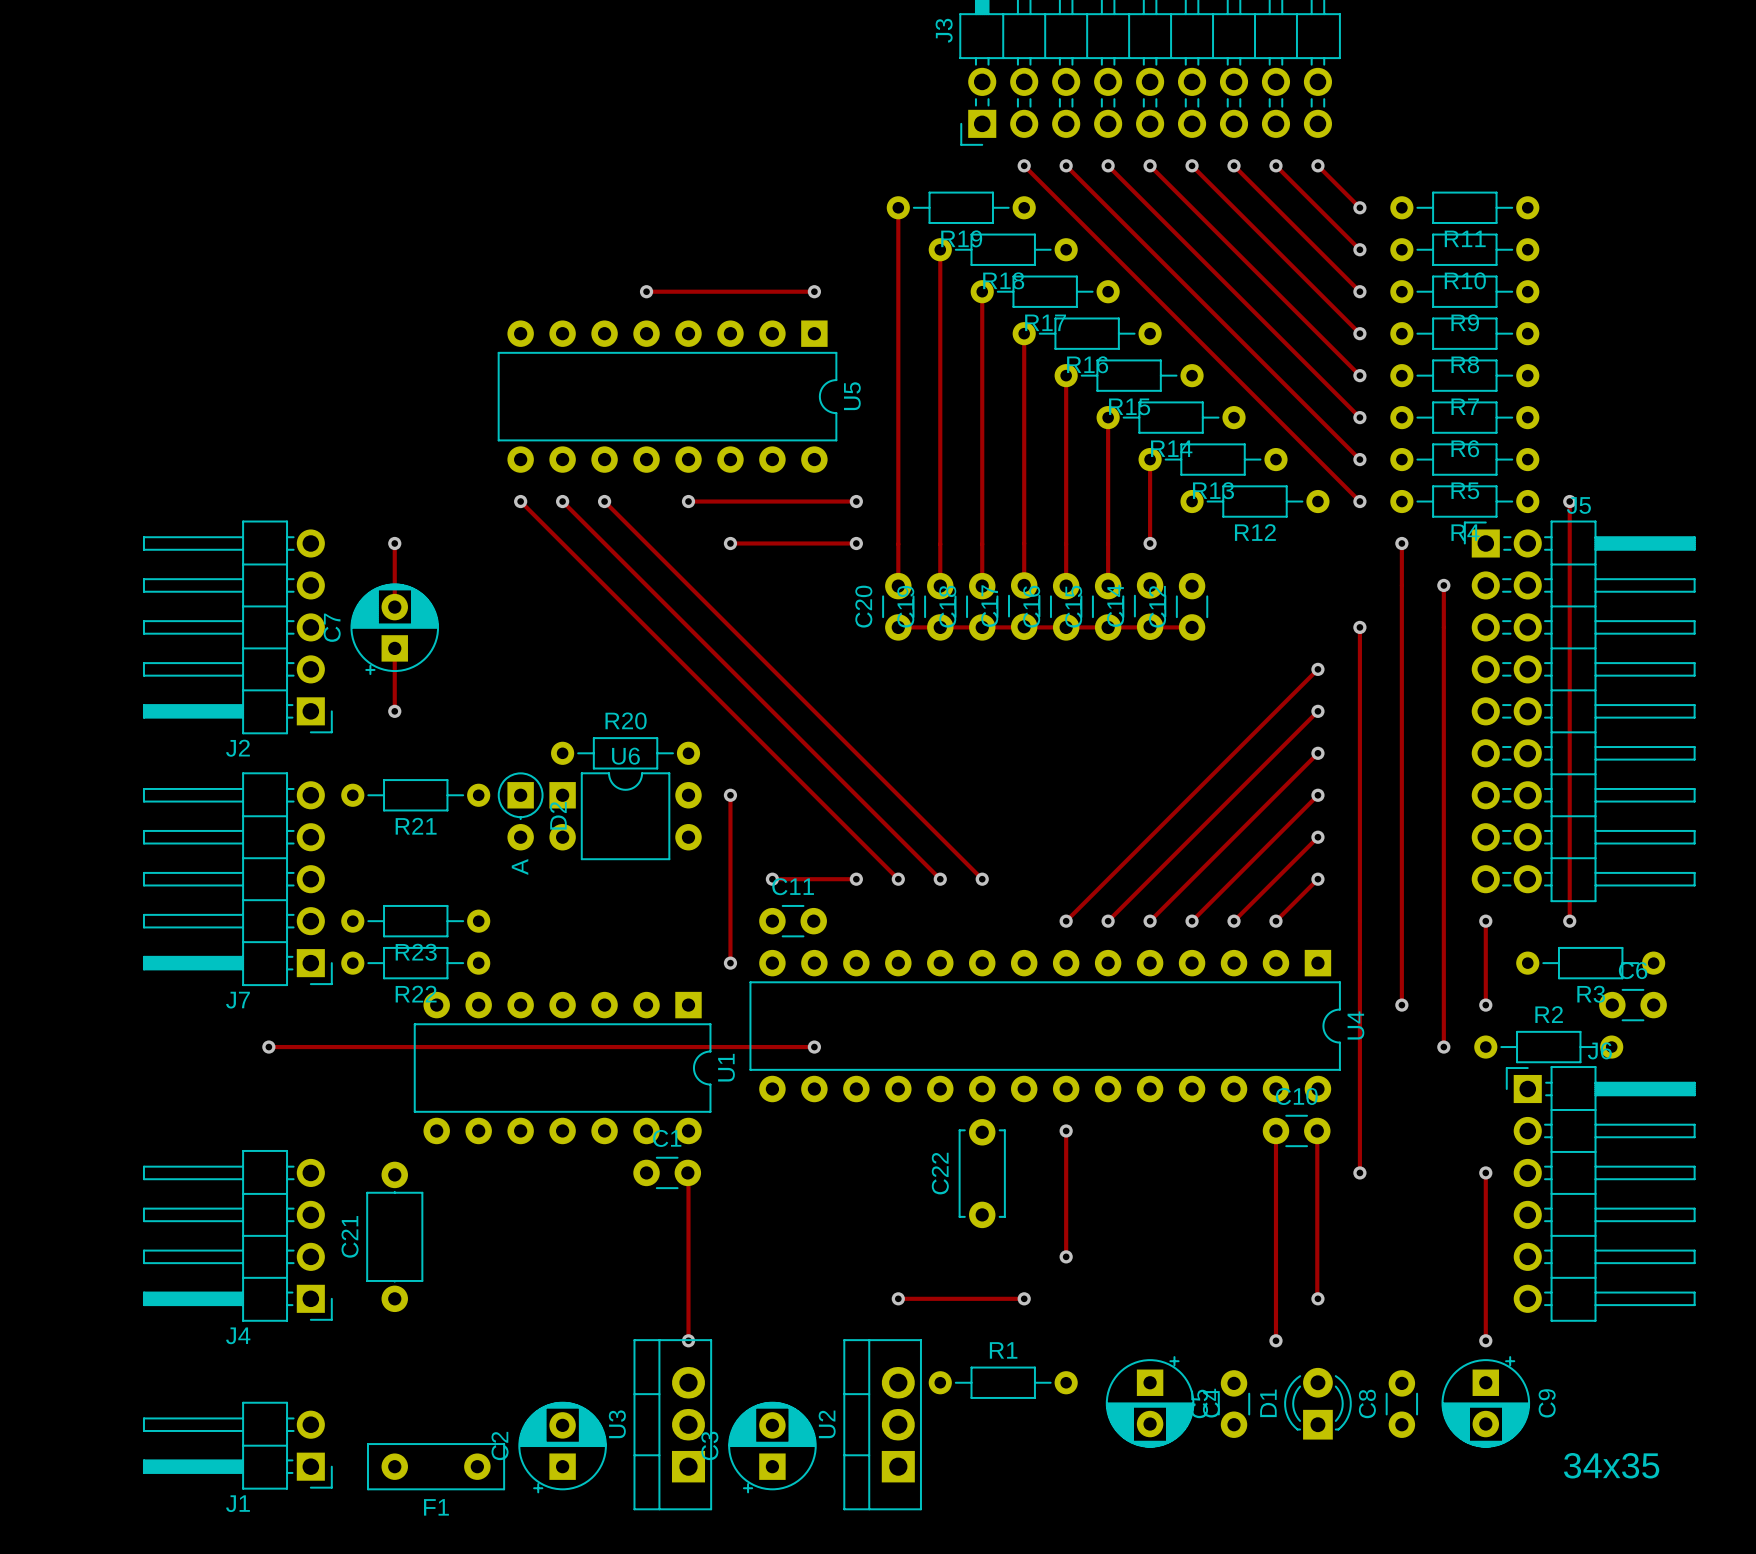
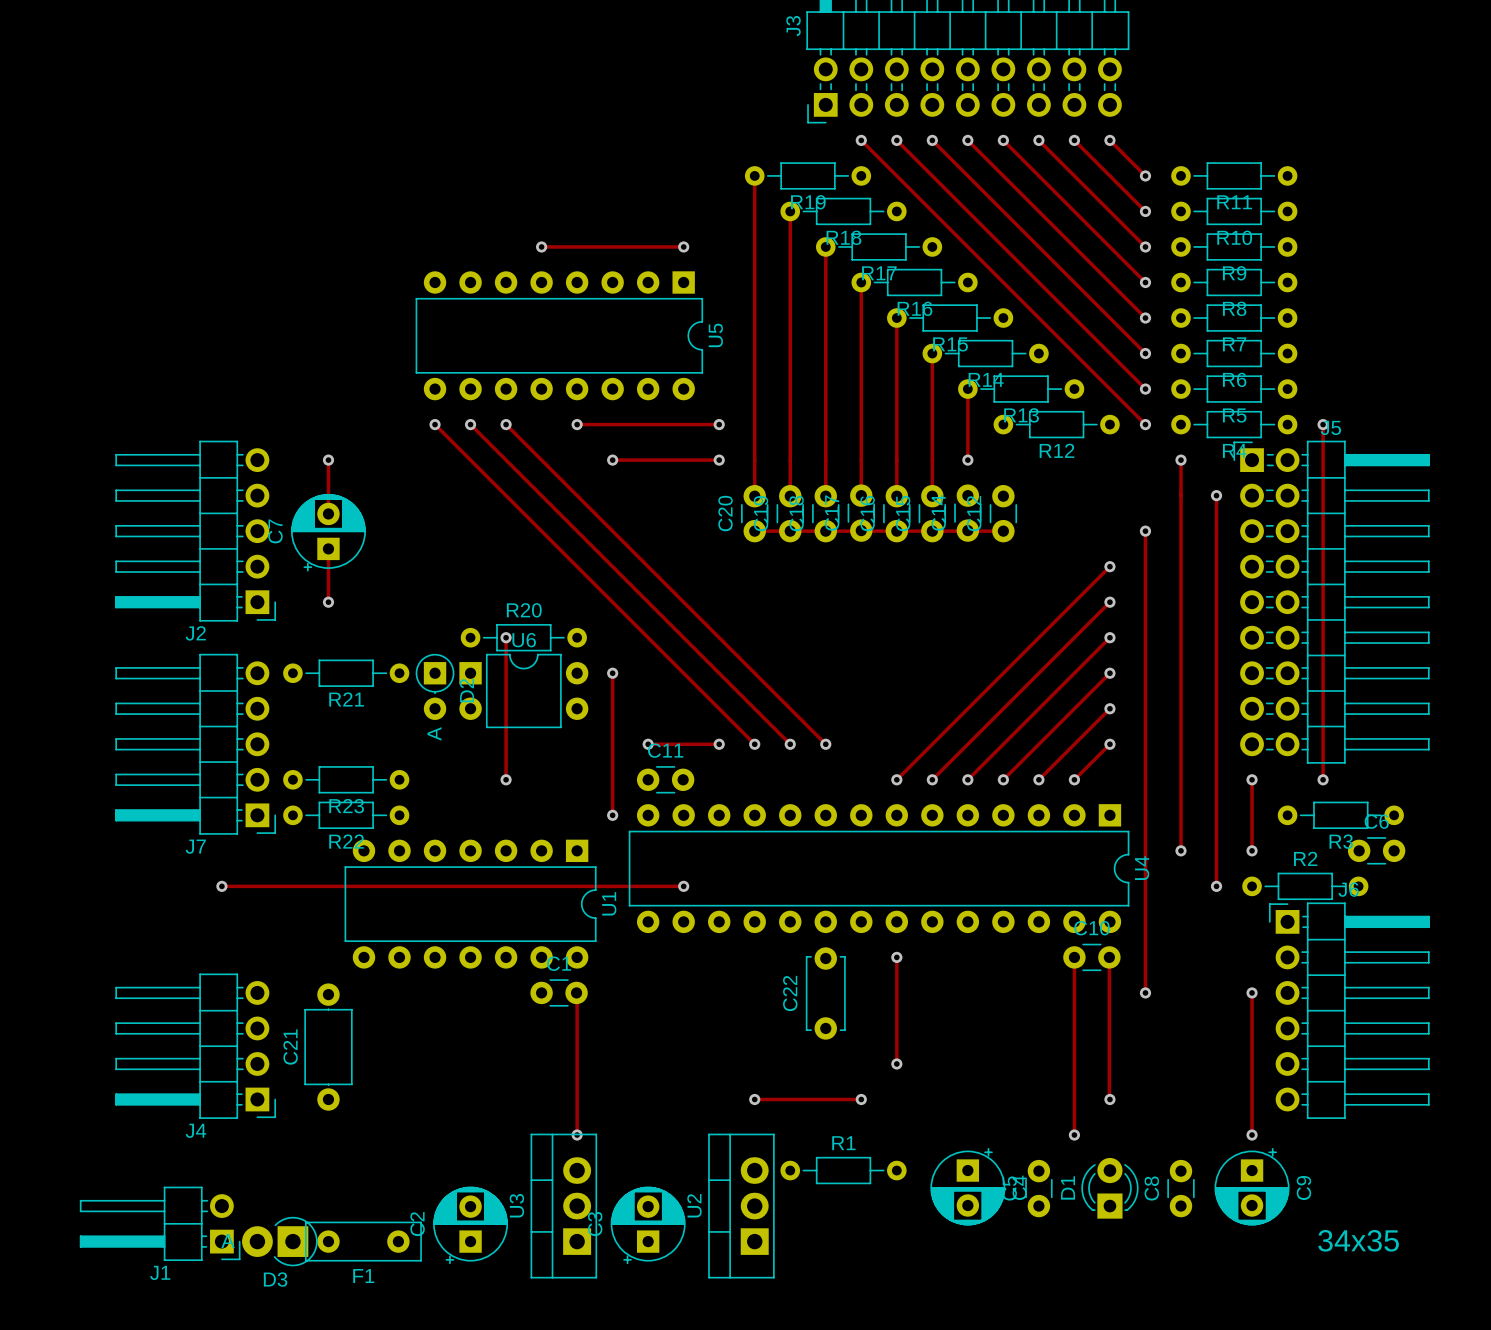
track: none -> (506, 637) (506, 779)
via: none -> (506, 637)
via: none -> (506, 779)
J1 position: (237, 1445) -> (160, 1223)
D3: none -> (279, 1241)

